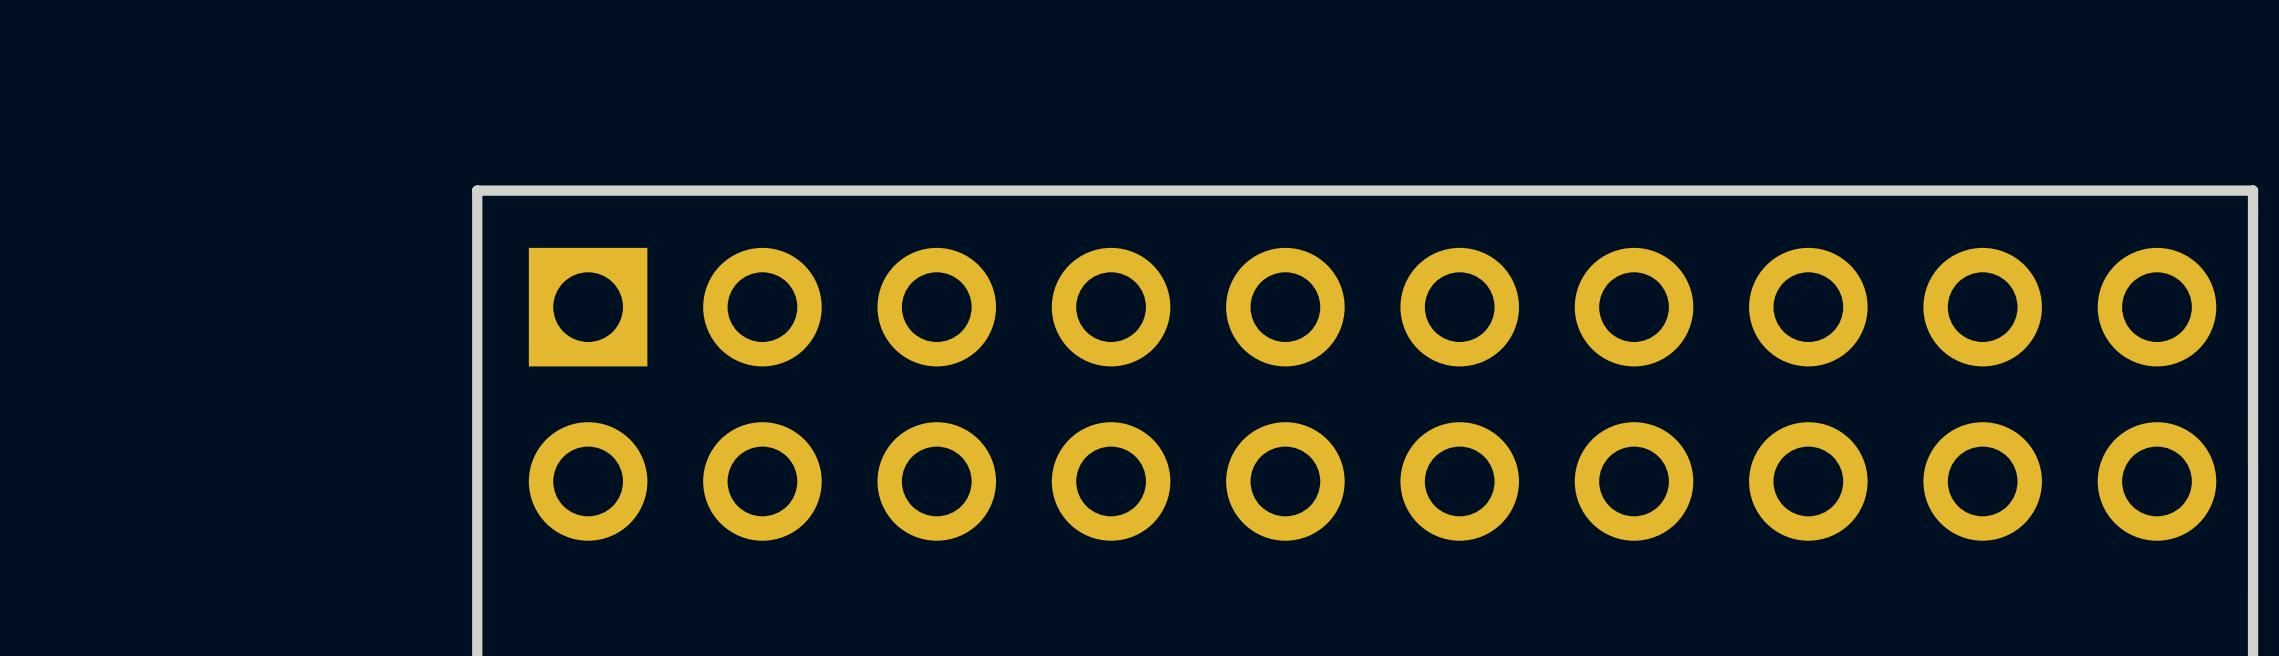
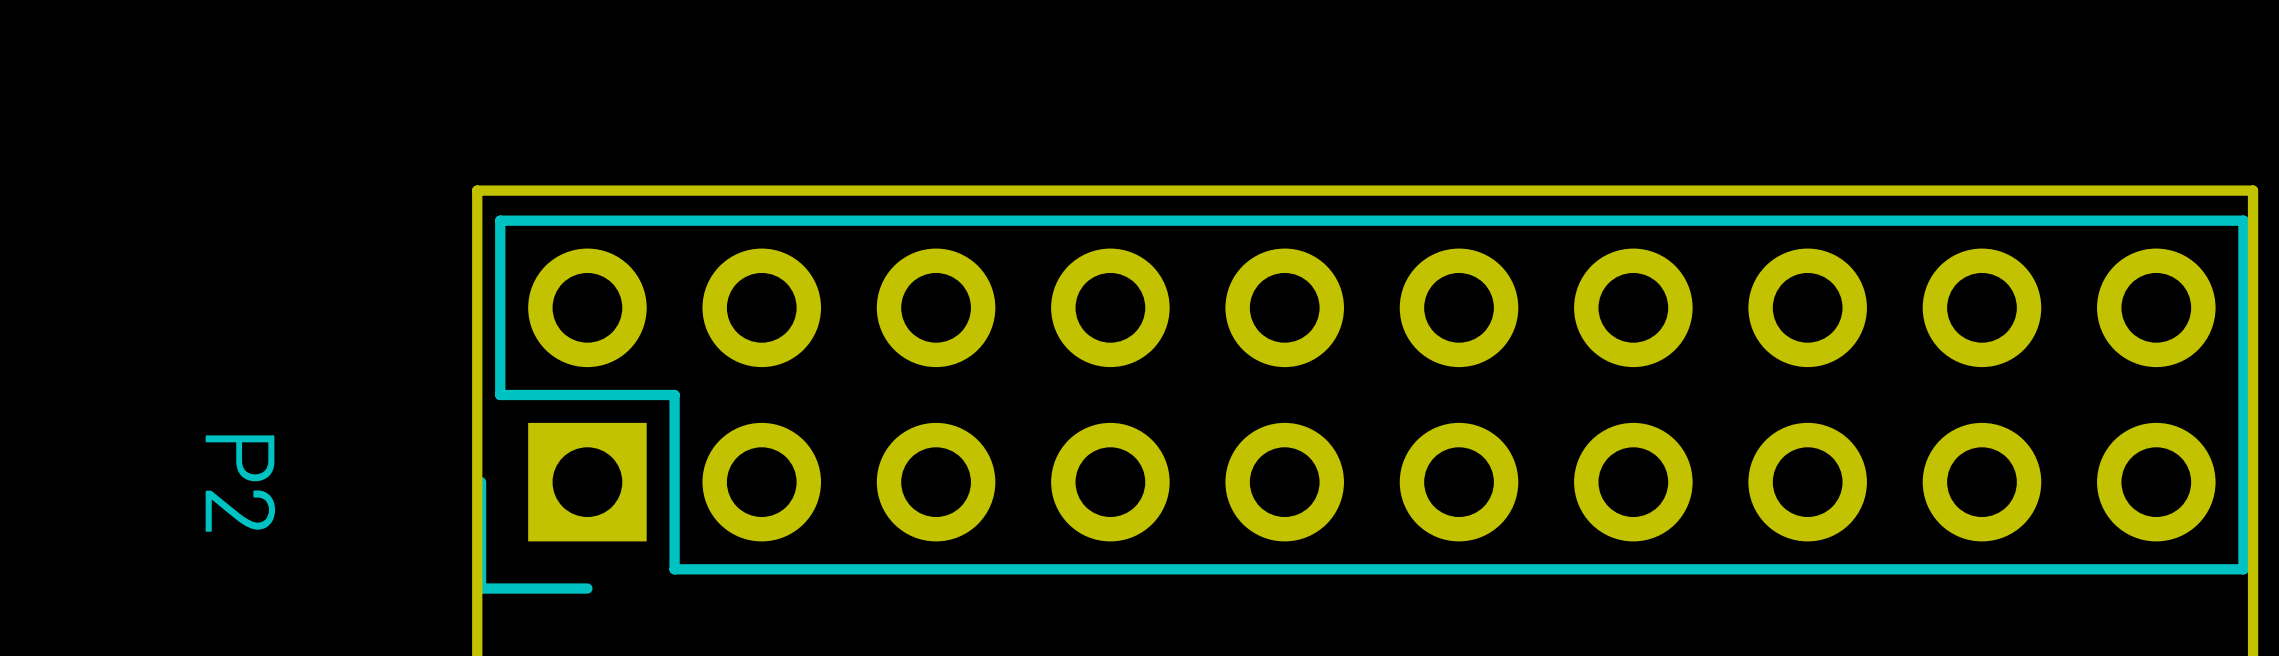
P2 side: top (1372, 394) -> bottom (1362, 404)

